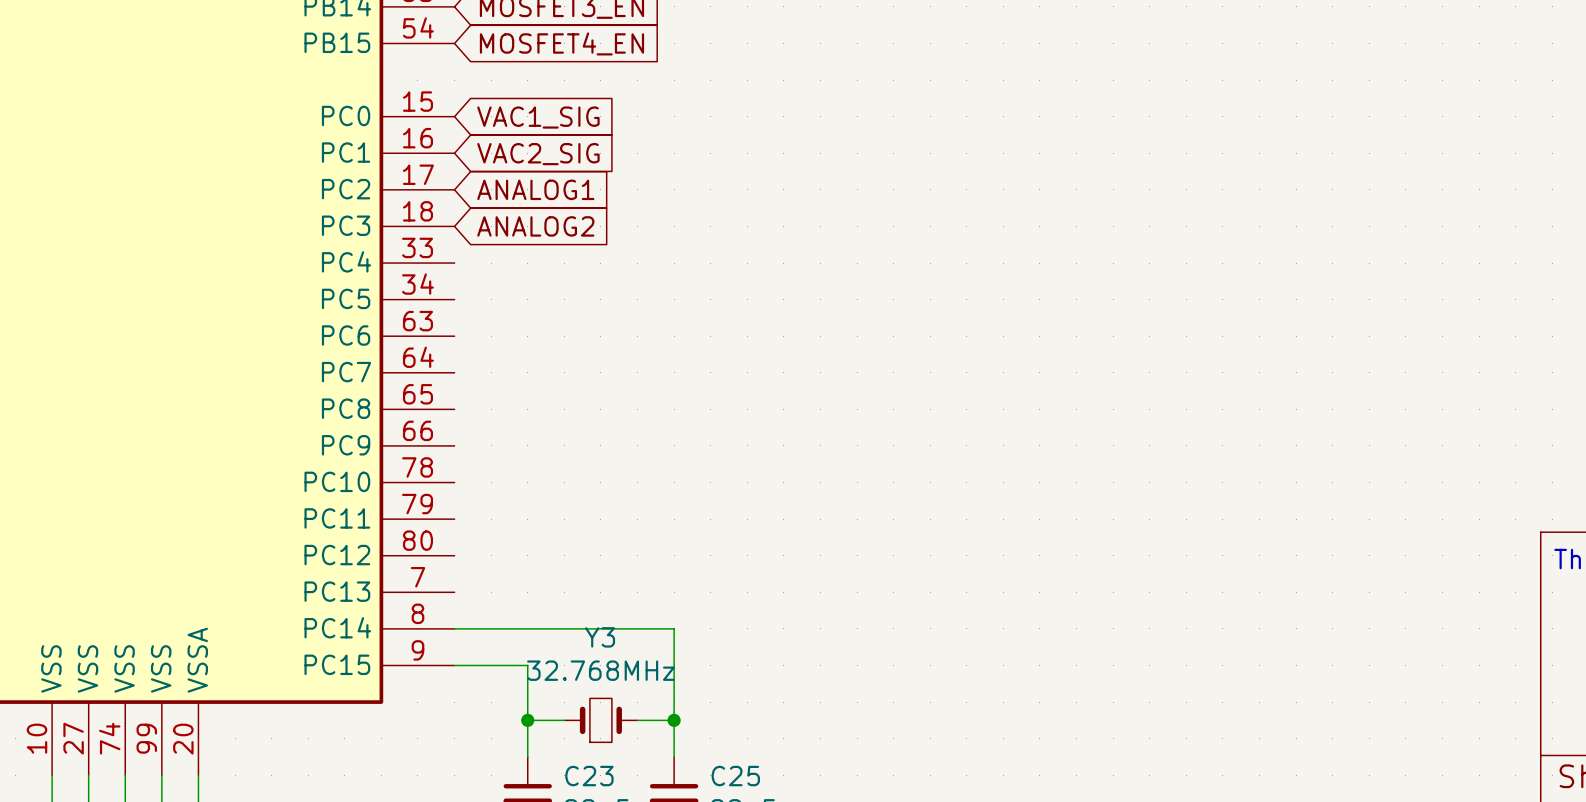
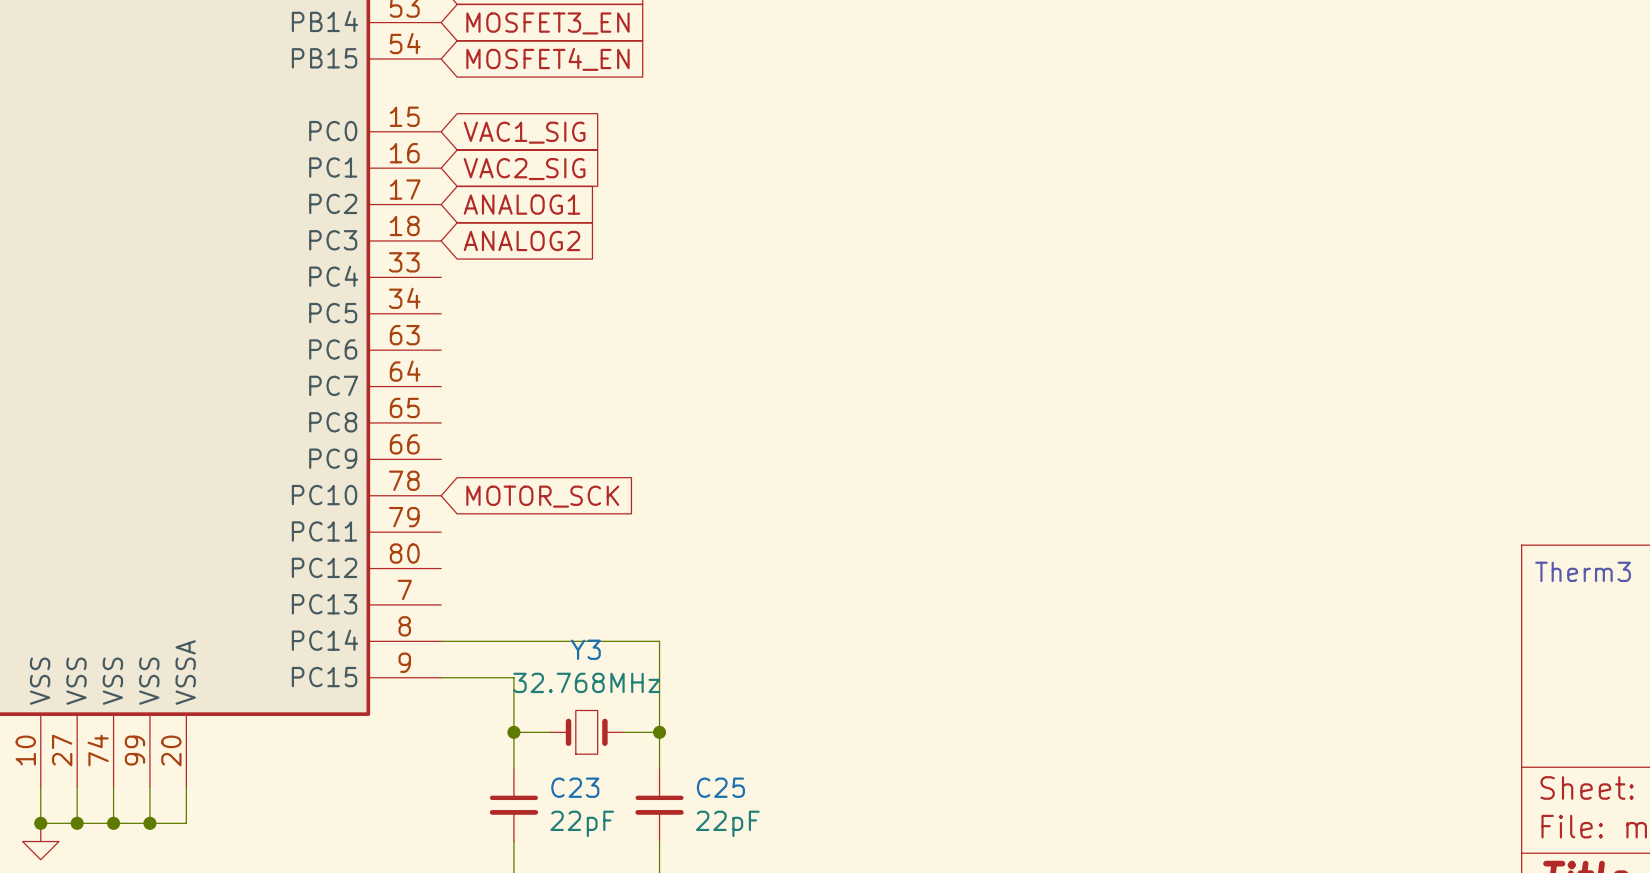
global label: none -> MOTOR_SCK (542, 496)

